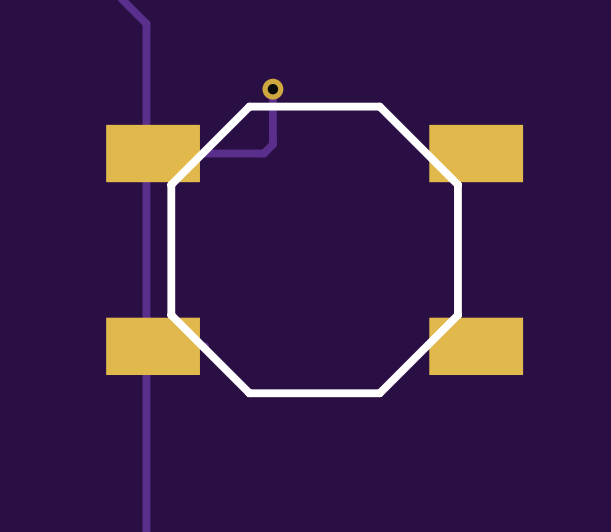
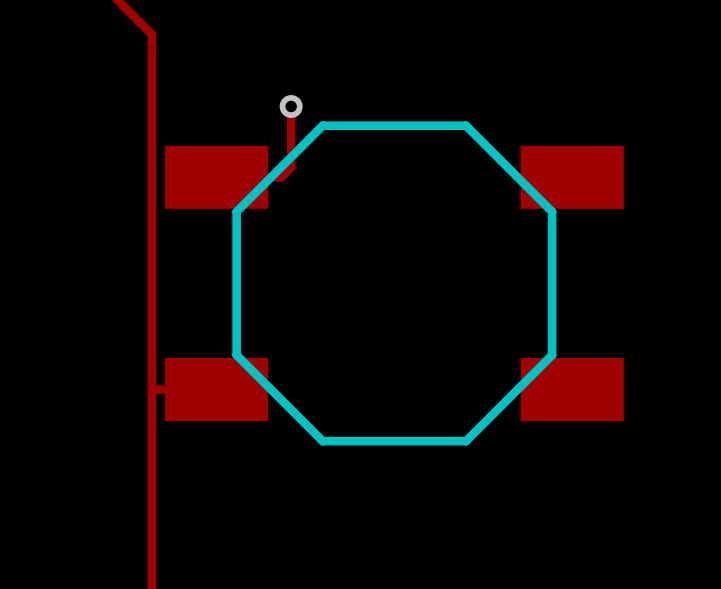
part position: (314, 249) -> (394, 283)

